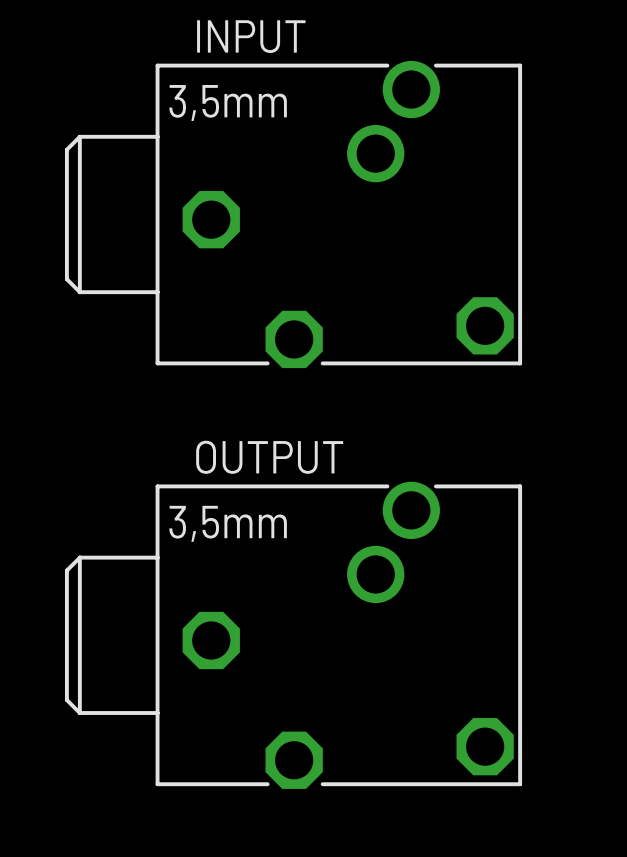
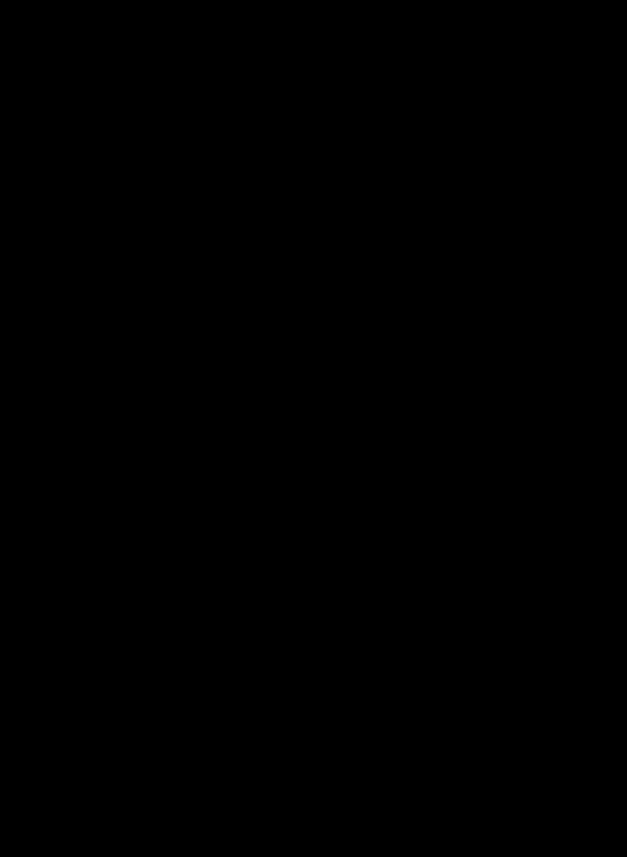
INPUT: (293, 214) -> none
OUTPUT: (293, 635) -> none

